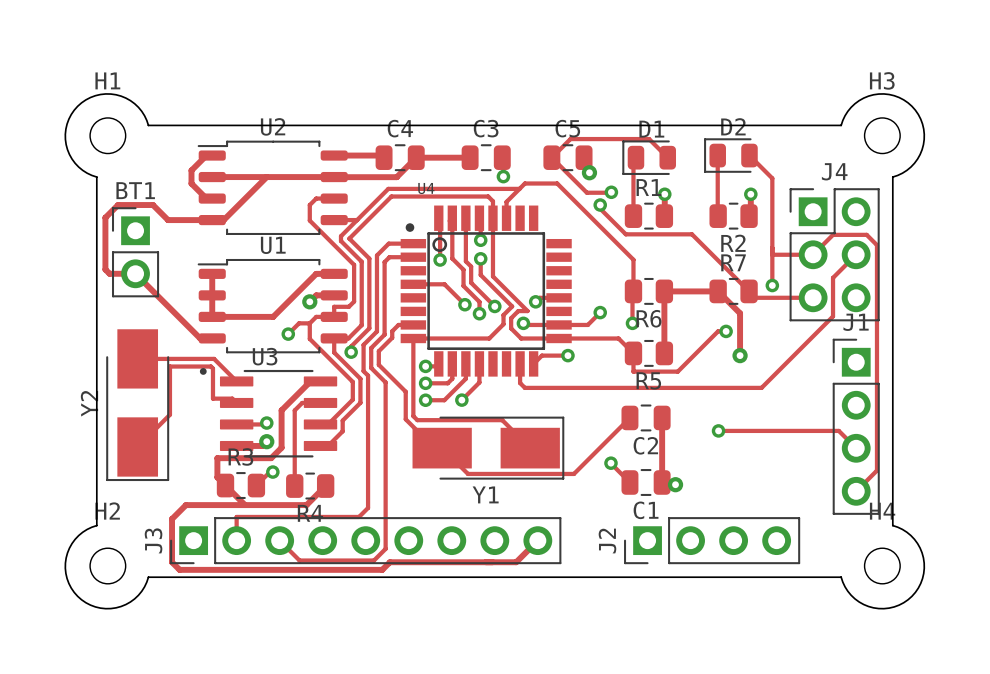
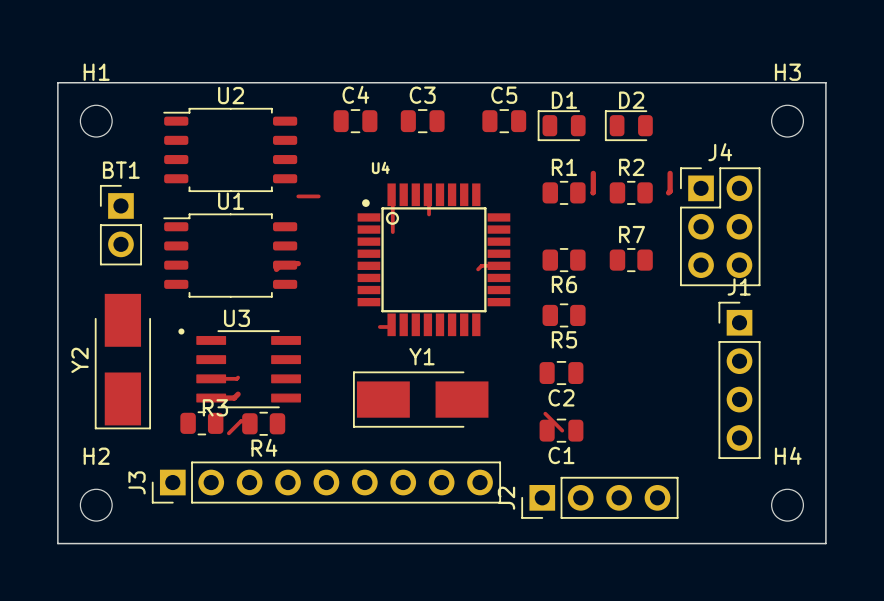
board edge: (148, 125) (841, 125) (851, 107) (863, 98) (883, 93) (903, 99) (918, 114) (923, 129) (924, 139) (920, 154) (914, 163) (902, 173) (892, 177) (892, 525) (910, 535) (920, 548) (924, 568) (918, 588) (903, 602) (883, 608) (868, 606) (854, 598) (845, 586) (841, 577) (148, 577) (138, 595) (125, 604) (105, 608) (85, 602) (74, 592) (68, 583) (65, 563) (67, 552) (75, 539) (82, 532) (96, 525) (96, 177) (82, 170) (72, 159) (66, 144) (65, 129) (71, 114) (77, 106) (90, 97) (105, 93) (121, 96) (134, 103) (144, 115) (148, 125) -> (57, 82) (57, 543) (825, 543) (825, 82) (57, 82)
track: (212, 155) (206, 155) (191, 170) (191, 183) (206, 198) (212, 198) -> none
track: (334, 155) (381, 155) (384, 157) -> none
track: (717, 155) (718, 216) -> none
D2 position: (730, 155) -> (628, 125)
track: (749, 155) (772, 178) (772, 285) -> none
C4 position: (400, 157) -> (355, 121)
track: (470, 157) (416, 157) (396, 177) (334, 177) -> none
C3 position: (486, 157) -> (422, 121)
C5 position: (567, 157) -> (504, 121)
track: (635, 157) (633, 160) (633, 216) -> none
D1 position: (649, 157) -> (561, 125)
track: (667, 157) (649, 139) (570, 139) (551, 157) (586, 192) (611, 192) -> none
via: (589, 172) -> none
via: (503, 176) -> none
track: (212, 177) (334, 177) -> none
track: (266, 177) (223, 220) (168, 220) (153, 205) (118, 205) (105, 217) (105, 269) (109, 273) (135, 273) (200, 338) (218, 338) -> none
U2 position: (272, 187) -> (230, 149)
track: (519, 188) (388, 188) (340, 236) (340, 241) (361, 261) (361, 325) (348, 338) (334, 338) (334, 352) (360, 378) (360, 402) (342, 420) (342, 431) (328, 445) (320, 445) -> none
via: (611, 192) -> none
via: (664, 194) -> none
via: (750, 194) -> none
track: (334, 198) (316, 198) (309, 205) (309, 220) (354, 264) (354, 301) (348, 306) (334, 306) (334, 316) (316, 316) (309, 323) -> none
track: (600, 205) (600, 208) (625, 234) (691, 234) (755, 297) (813, 297) -> none
via: (600, 205) -> none
R1 position: (648, 216) -> (564, 192)
R2 position: (733, 216) -> (631, 192)
track: (465, 218) (465, 261) (471, 266) (471, 282) (494, 306) -> none
track: (506, 218) (506, 201) (524, 183) (557, 183) (633, 259) (632, 323) -> none
track: (449, 220) (452, 218) (452, 258) (463, 269) (463, 285) (479, 301) (479, 313) -> none
via: (480, 240) -> none
track: (413, 243) (388, 243) (376, 255) (376, 331) (363, 344) (363, 371) (368, 375) (368, 507) (359, 516) (236, 516) (236, 540) -> none
R2 name position: R2 (733, 243) -> R2 (631, 167)
track: (772, 254) (813, 254) (833, 234) (866, 234) (876, 245) (876, 470) (856, 491) -> none
J4 position: (834, 254) -> (720, 226)
track: (856, 254) (833, 277) (833, 316) (761, 387) (524, 387) (520, 383) (520, 363) -> none
track: (413, 257) (389, 257) (384, 262) (384, 334) (371, 348) (371, 367) (385, 382) (385, 548) (373, 560) (299, 560) (279, 540) -> none
track: (480, 258) (480, 275) (512, 306) (503, 315) (503, 324) (489, 338) (413, 338) (413, 416) (417, 420) (502, 420) (530, 448) -> none
via: (480, 258) -> none
via: (440, 260) -> none
track: (212, 273) (212, 316) (273, 316) (316, 273) (334, 273) -> none
track: (413, 284) (444, 284) (464, 304) -> none
via: (772, 285) -> none
R6 position: (648, 291) -> (564, 260)
R7 position: (733, 291) -> (631, 260)
via: (309, 301) -> none
via: (535, 301) -> none
via: (464, 304) -> none
U1 position: (272, 306) -> (230, 255)
via: (494, 306) -> none
track: (600, 312) (587, 324) (525, 324) (523, 323) -> none
via: (600, 312) -> none
via: (479, 313) -> none
track: (309, 323) (309, 338) (352, 381) (352, 399) (328, 424) (320, 424) -> none
track: (309, 323) (299, 323) (288, 334) -> none
via: (523, 323) -> none
via: (632, 323) -> none
track: (413, 324) (398, 324) (392, 331) (392, 337) (378, 351) (378, 364) (405, 391) (405, 419) (434, 448) (442, 448) (467, 473) (573, 473) (629, 417) -> none
track: (726, 331) (718, 331) (677, 371) (633, 371) (633, 353) (618, 338) (521, 338) (511, 328) (511, 318) (518, 311) (527, 311) (492, 276) (492, 201) (488, 196) (391, 196) (349, 238) (369, 258) (369, 328) (351, 346) (351, 352) -> none
via: (726, 331) -> none
via: (288, 334) -> none
via: (351, 352) -> none
R5 position: (648, 353) -> (564, 315)
track: (664, 353) (664, 291) (718, 291) (740, 313) (740, 355) -> none
track: (567, 355) (541, 355) (533, 363) -> none
via: (567, 355) -> none
via: (740, 355) -> none
track: (137, 358) (214, 358) (236, 381) -> none
track: (452, 363) (452, 378) (447, 383) (425, 383) -> none
track: (465, 363) (465, 378) (444, 400) (425, 400) -> none
track: (479, 363) (479, 382) (461, 400) -> none
via: (425, 366) -> none
track: (320, 381) (310, 381) (281, 410) (281, 447) (271, 458) (217, 458) (217, 477) (245, 505) -> none
via: (425, 383) -> none
via: (425, 400) -> none
via: (461, 400) -> none
track: (236, 402) (232, 398) (212, 398) (212, 368) (210, 366) (169, 366) (169, 414) (137, 446) -> none
track: (320, 402) (302, 402) (294, 410) (294, 486) -> none
C2 position: (646, 417) -> (561, 373)
track: (662, 417) (662, 482) (673, 482) (675, 484) -> none
via: (266, 423) -> none
J1 position: (856, 426) -> (739, 380)
track: (718, 430) (838, 430) (856, 448) -> none
via: (718, 430) -> none
via: (266, 441) -> none
Y1 rotation: 0° (488, 448) -> 180° (420, 399)
via: (610, 463) -> none
via: (272, 472) -> none
track: (325, 482) (325, 486) (306, 505) (185, 505) (172, 519) (172, 562) (179, 569) (382, 569) (389, 562) (516, 562) (537, 540) -> none
C1 position: (646, 482) -> (561, 430)
via: (675, 484) -> none
R3 position: (240, 485) -> (201, 423)
R4 position: (310, 486) -> (263, 423)
J2 position: (712, 540) -> (599, 497)

